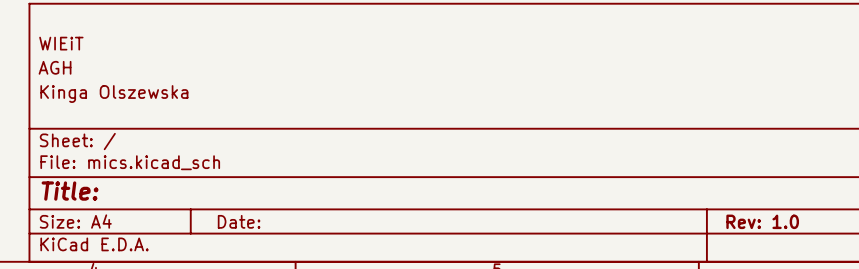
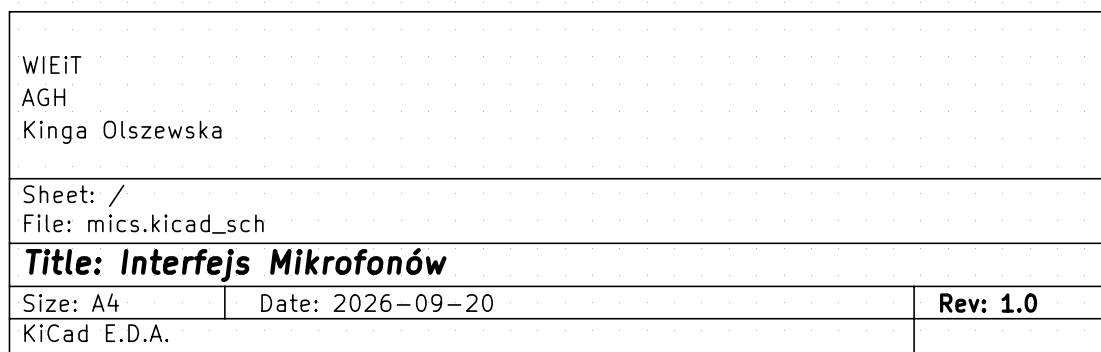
title block: Title: (70, 191) -> Title: Interfejs Mikrofonów (236, 264)
title block: Date: (239, 221) -> Date: 2026-09-20 (377, 303)

